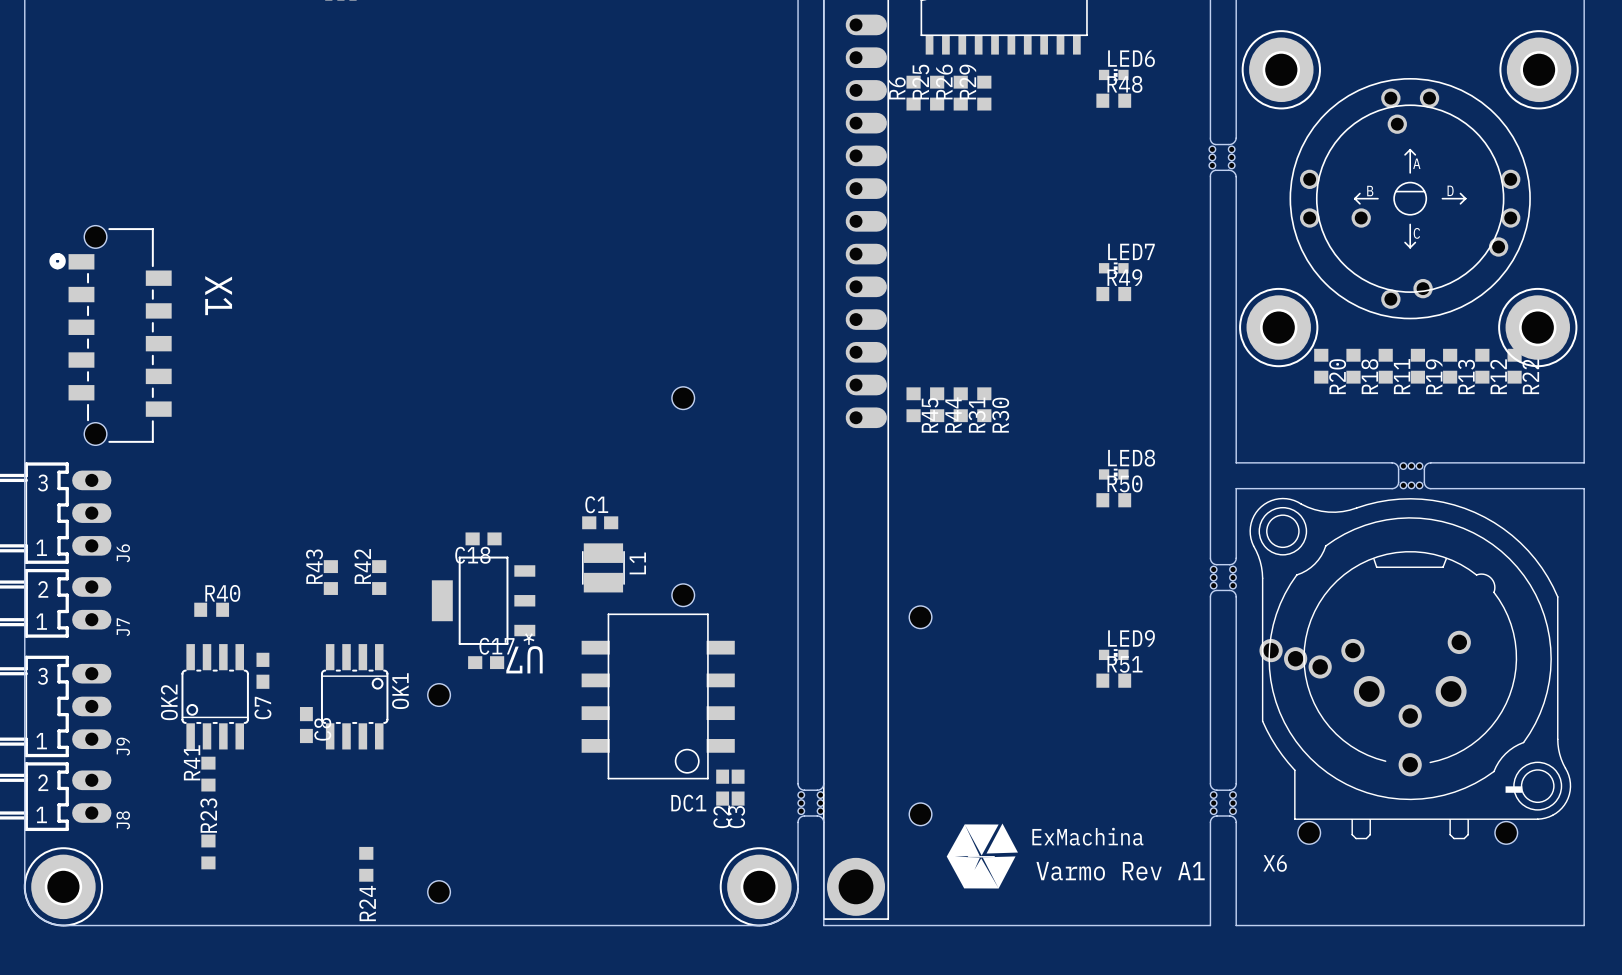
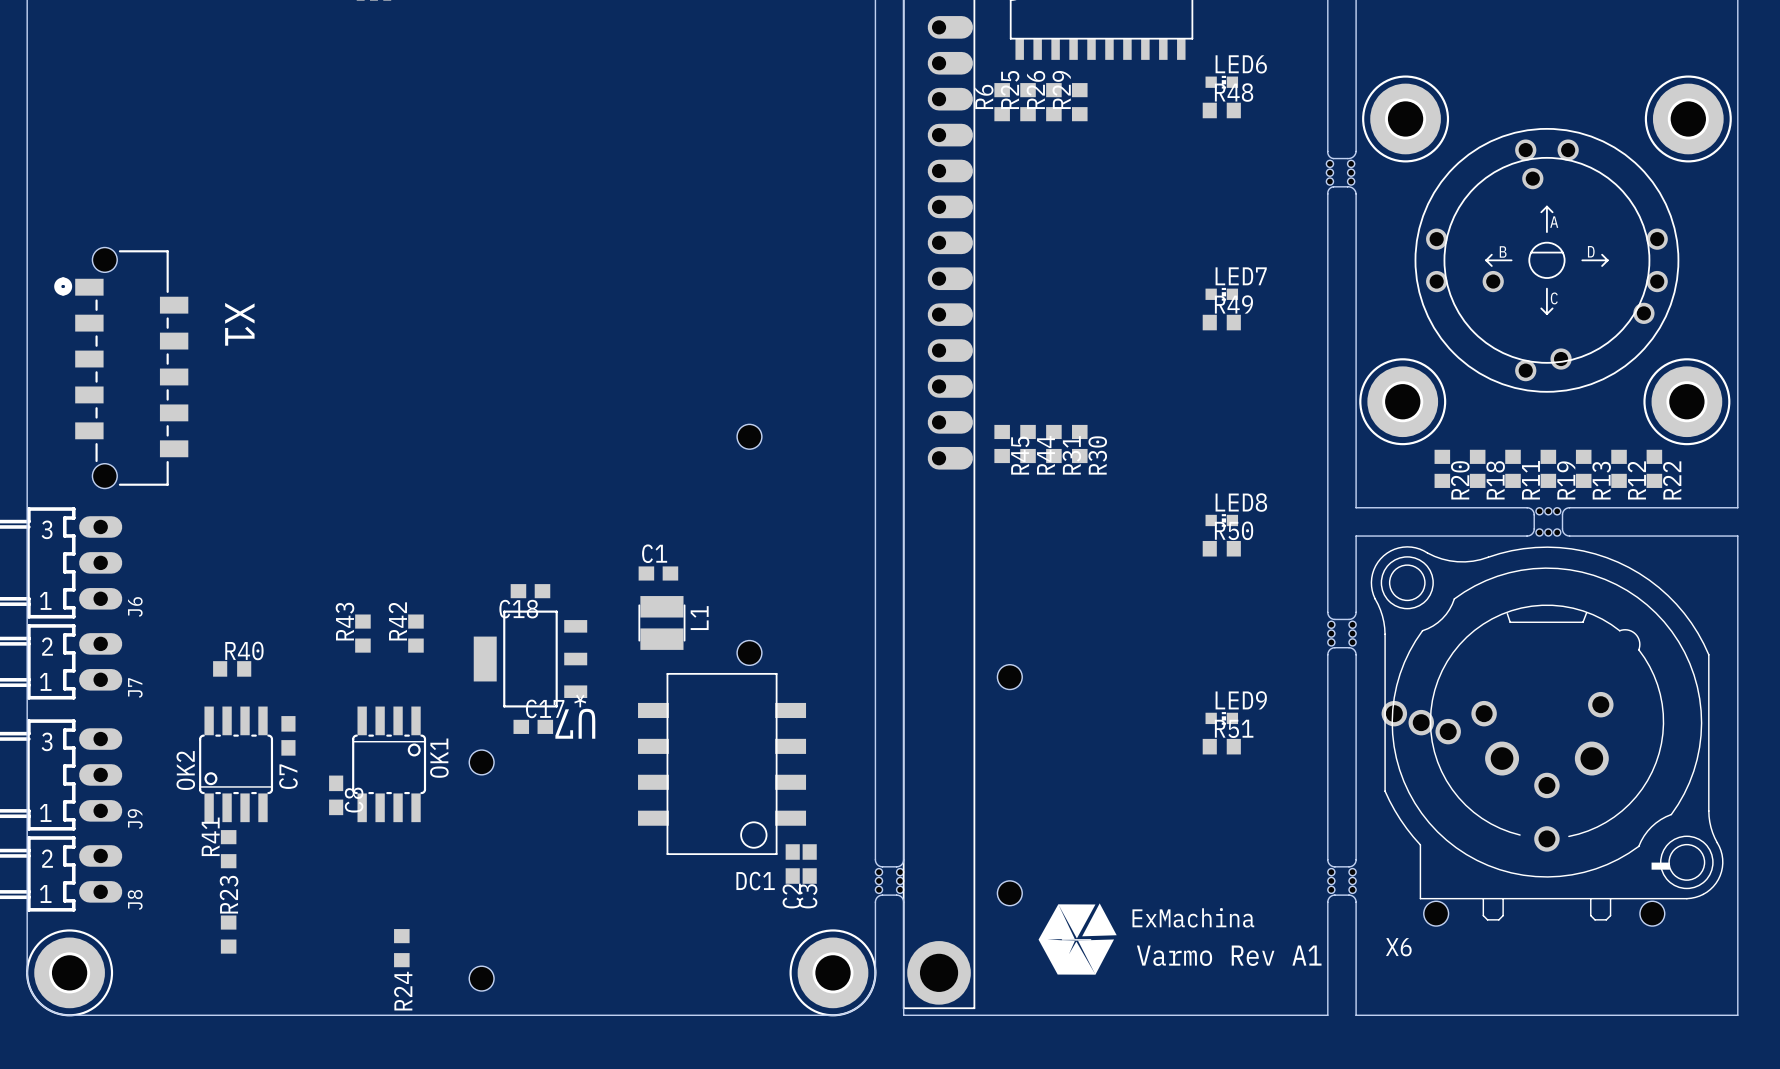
part position: (1281, 69) -> (1405, 118)
part position: (1539, 69) -> (1688, 118)
part position: (1410, 198) -> (1546, 260)
part position: (1278, 327) -> (1402, 401)
part position: (1537, 327) -> (1686, 401)
R20 position: (1321, 366) -> (1442, 468)
R18 position: (1353, 366) -> (1477, 468)
R11 position: (1385, 366) -> (1513, 468)
R19 position: (1417, 366) -> (1548, 468)
R13 position: (1450, 366) -> (1583, 468)
R12 position: (1482, 366) -> (1619, 468)
R22 position: (1514, 366) -> (1654, 468)

